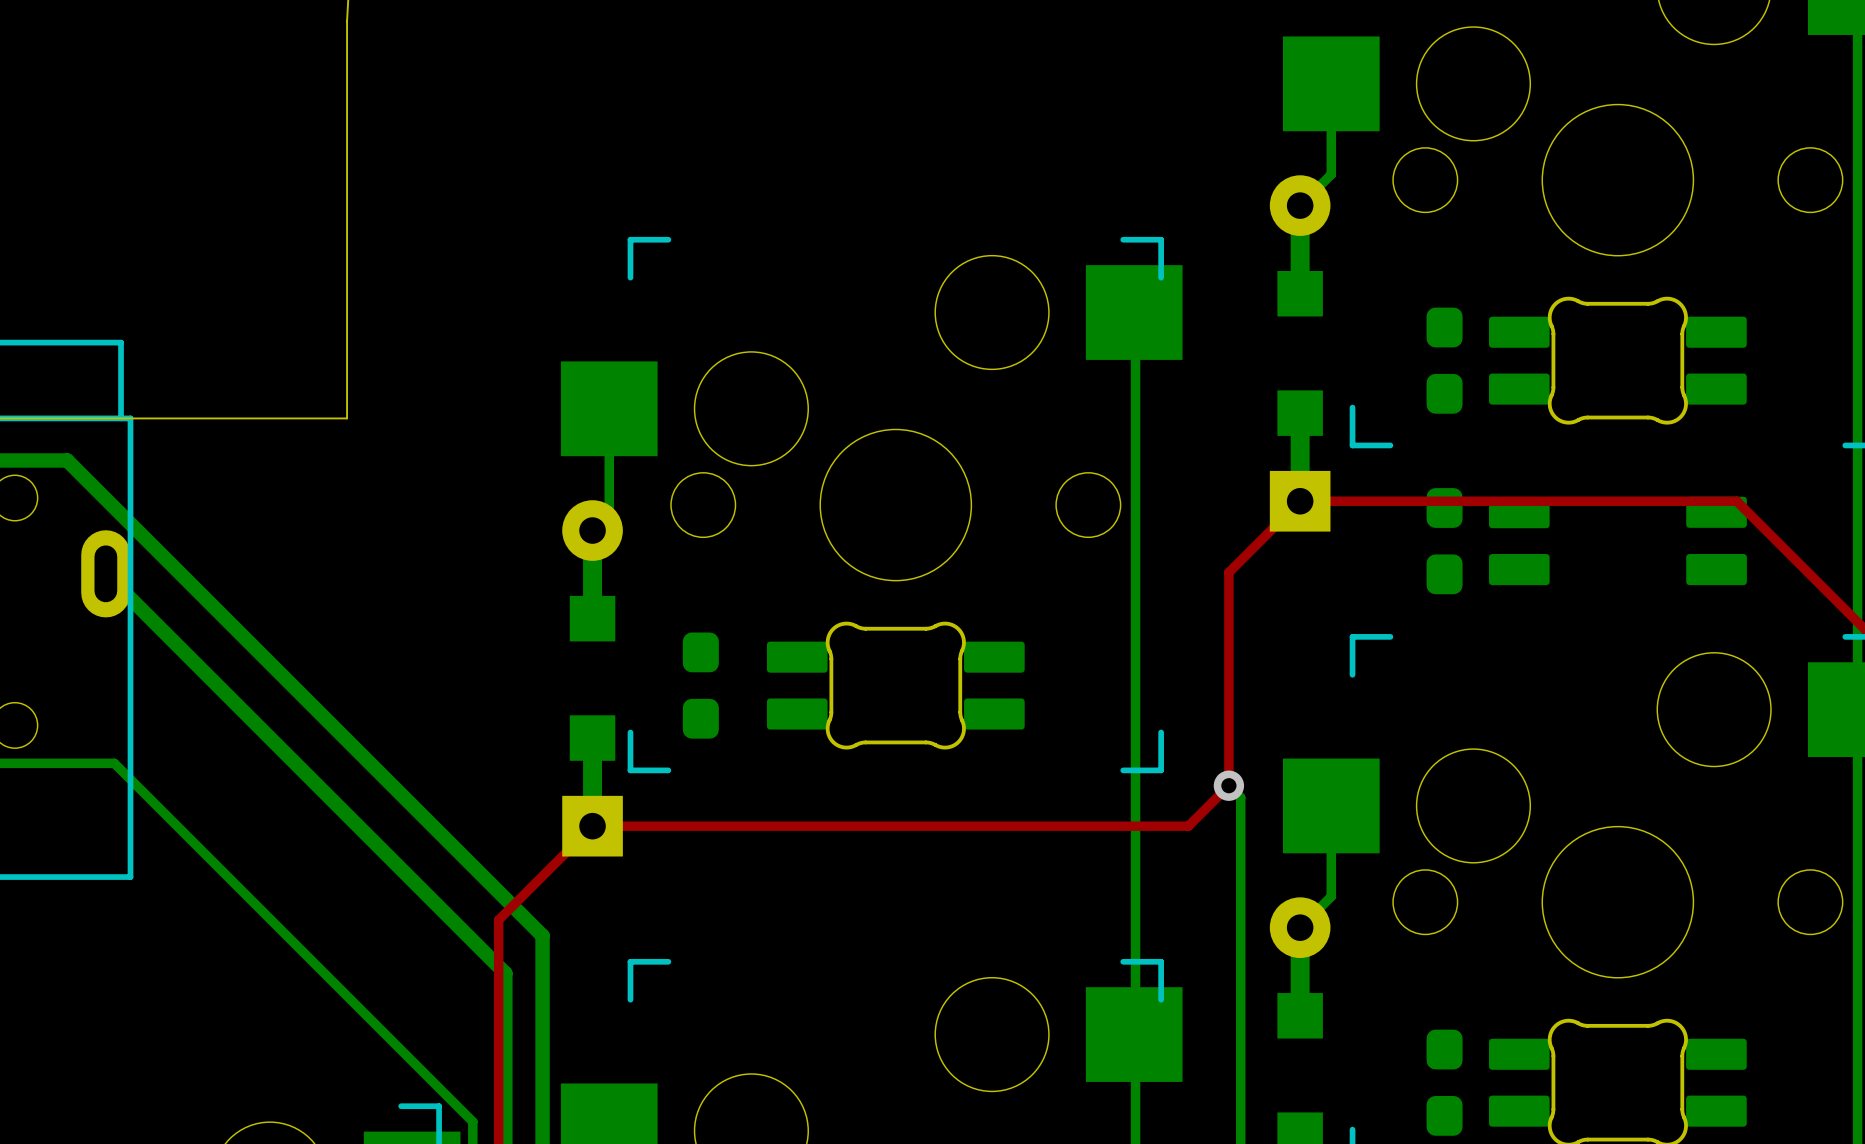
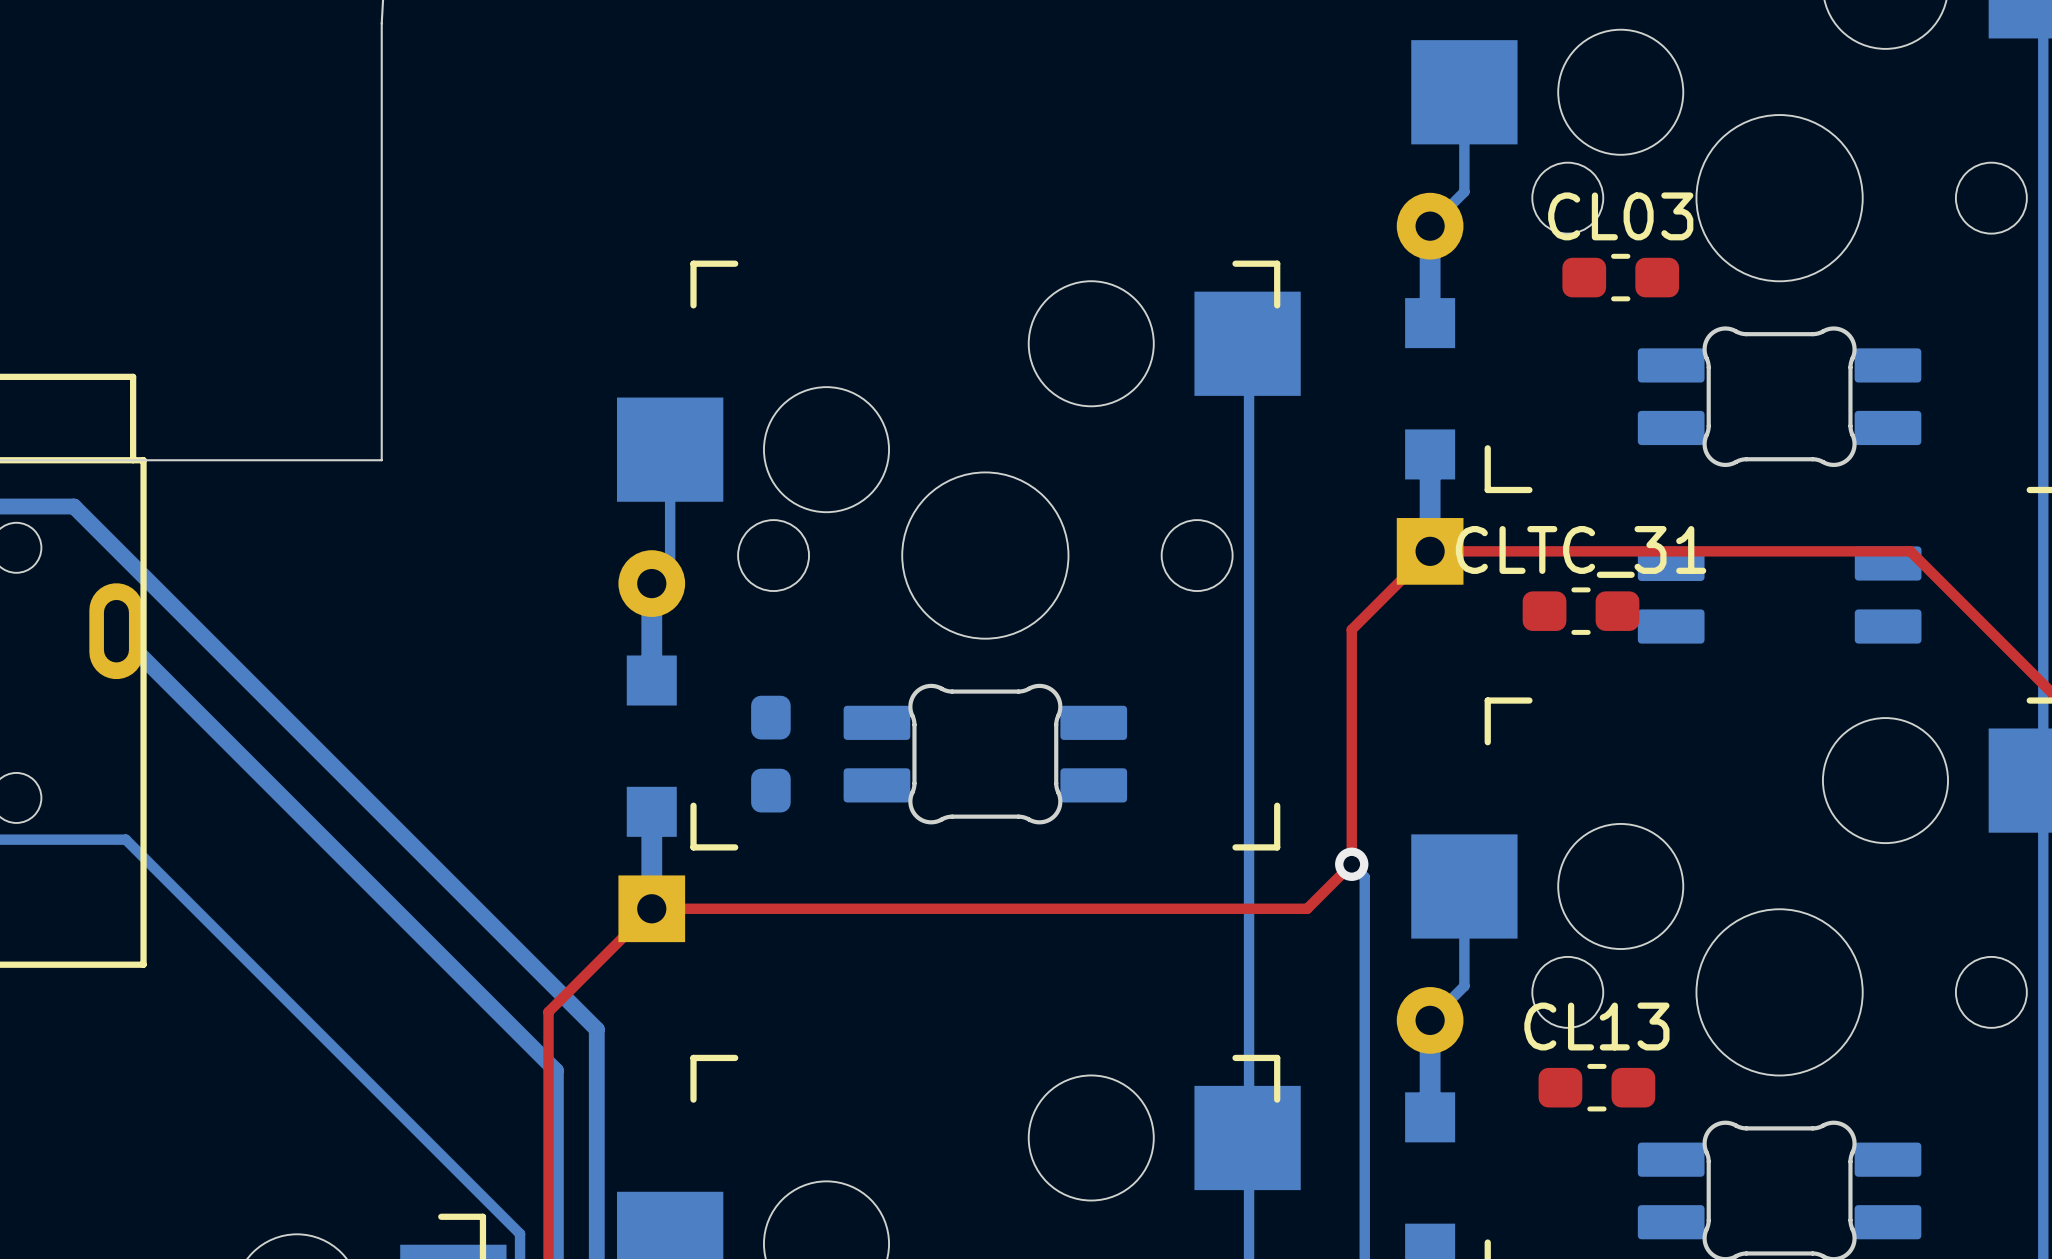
CL03 side: bottom (1444, 360) -> top (1620, 277)
CLTC_31 side: bottom (1444, 541) -> top (1581, 611)
CL13 side: bottom (1444, 1082) -> top (1596, 1087)

